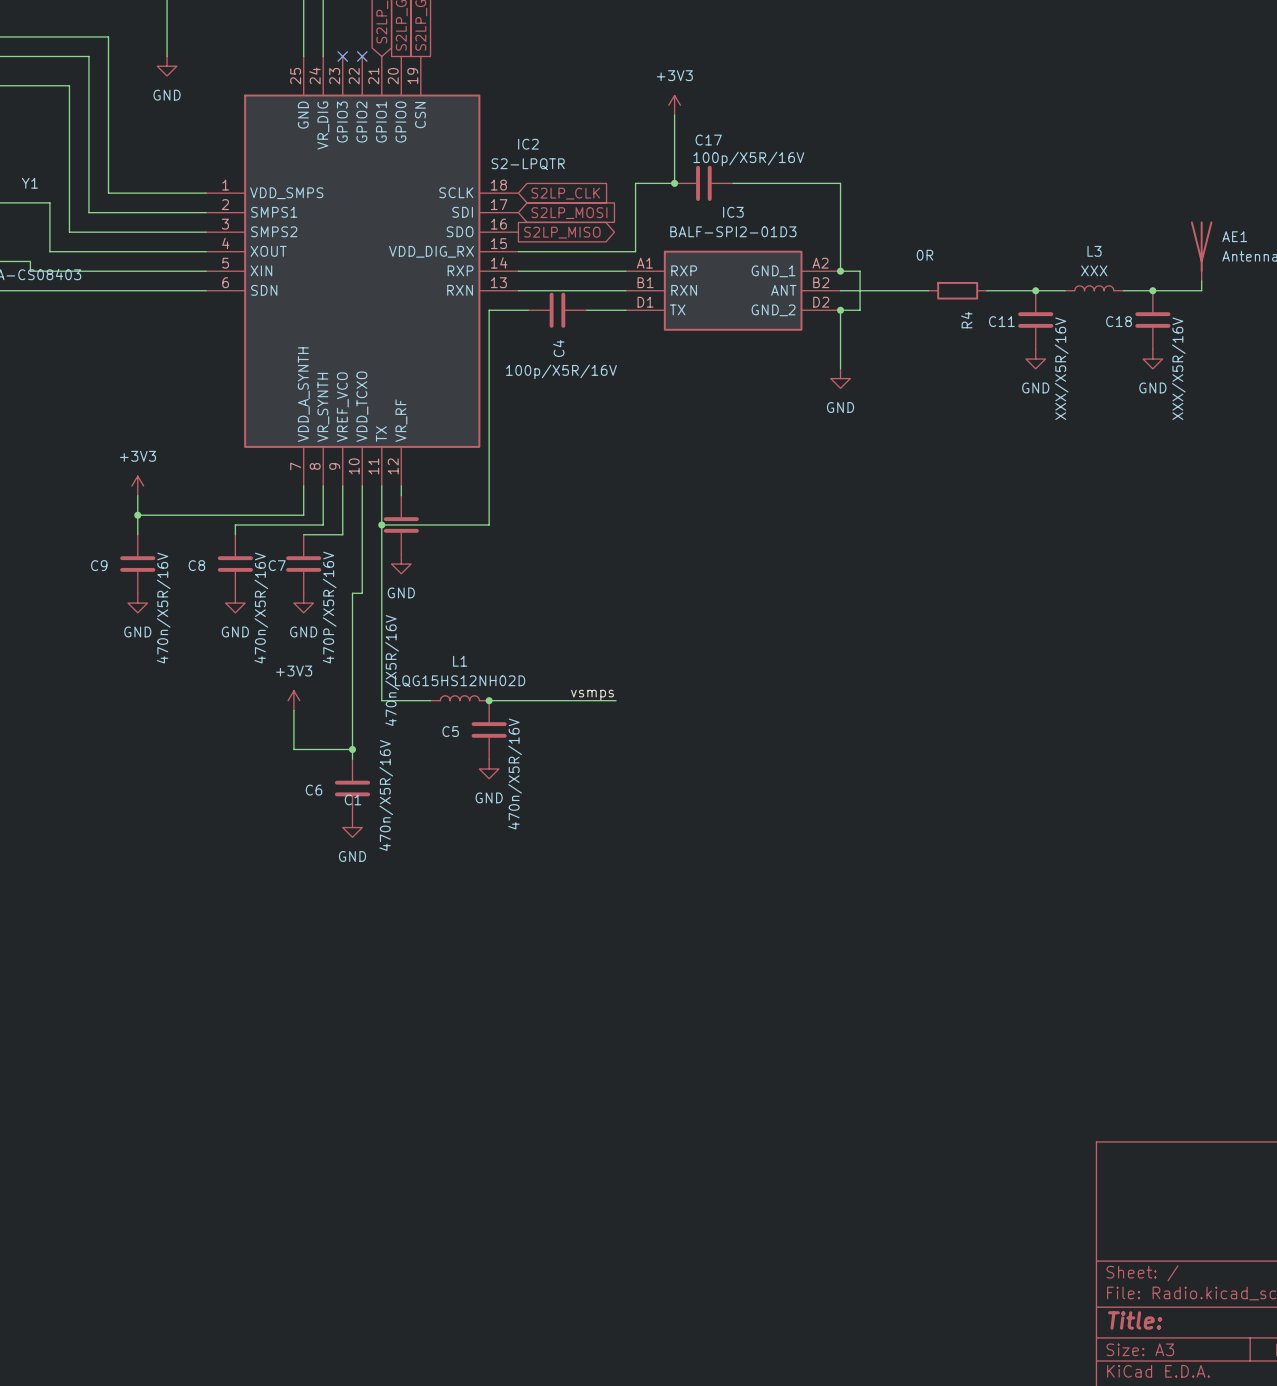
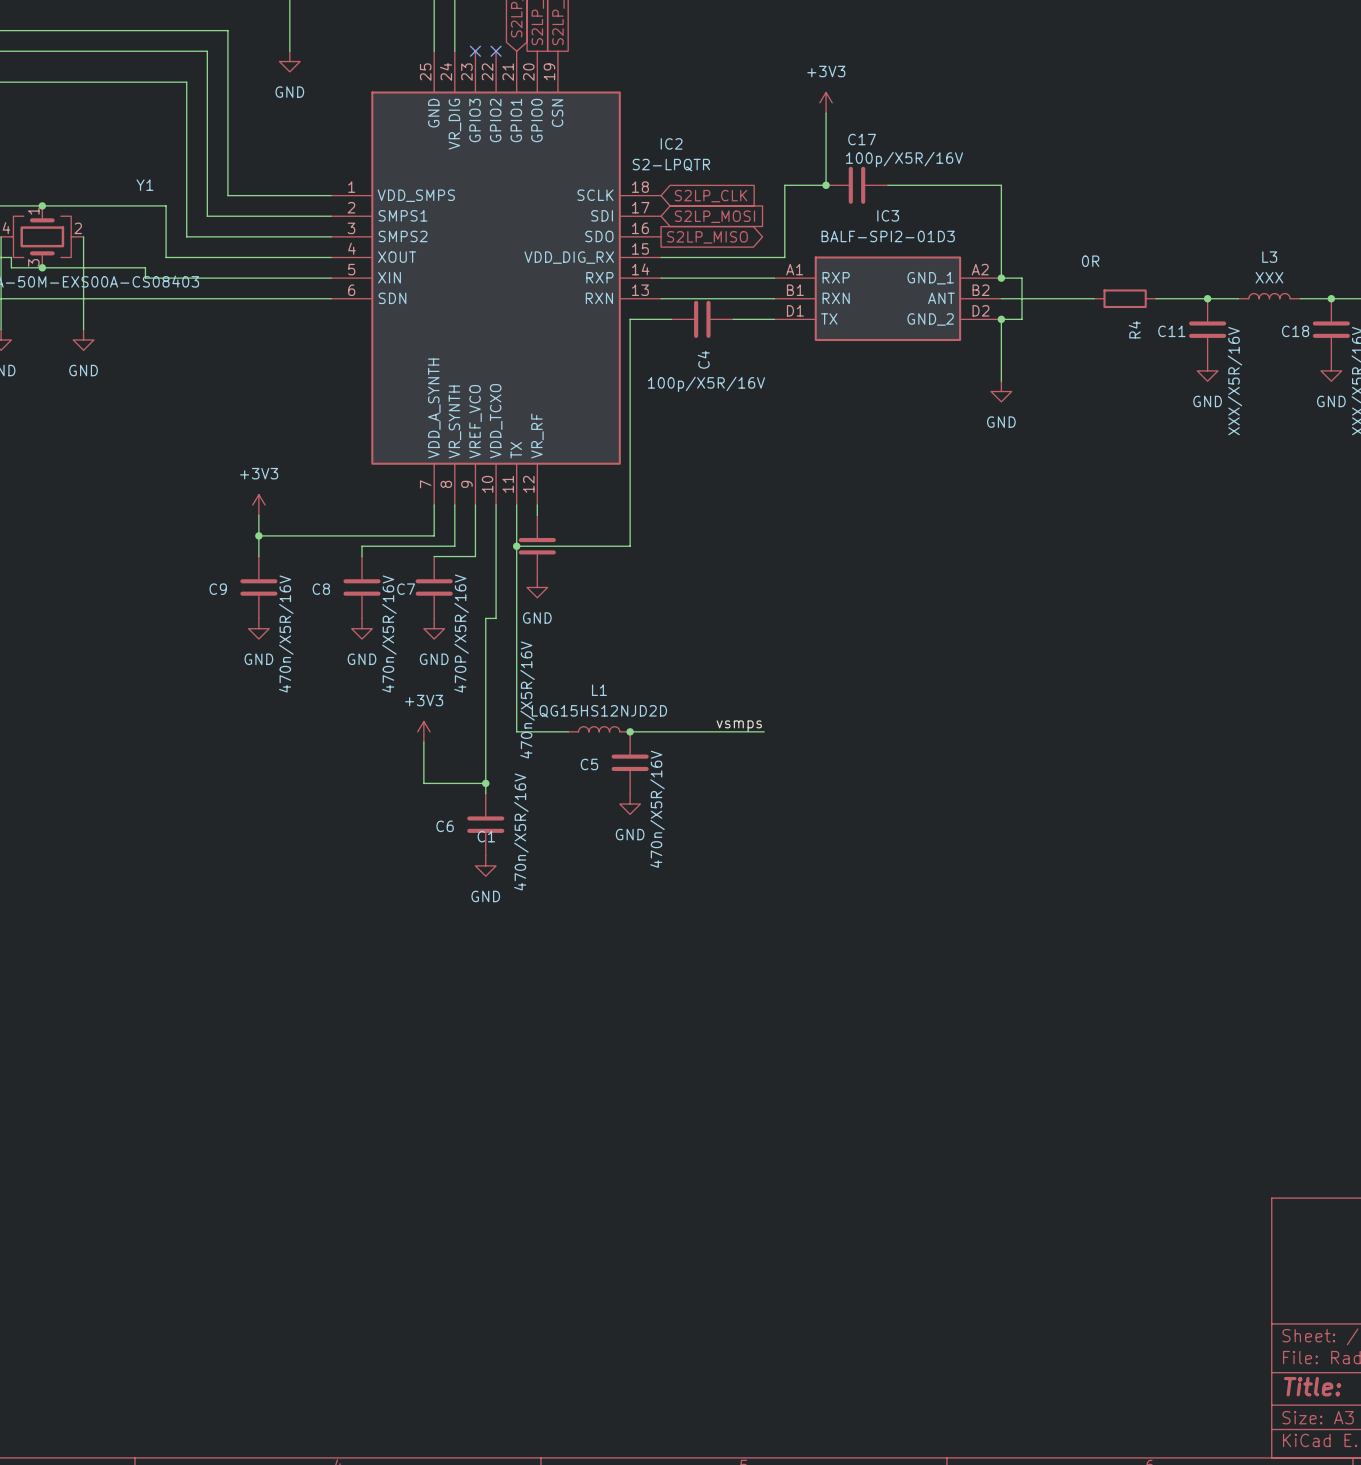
L1 value: LQG15HS12NH02D (460, 681) -> LQG15HS12NJD2D (599, 711)

